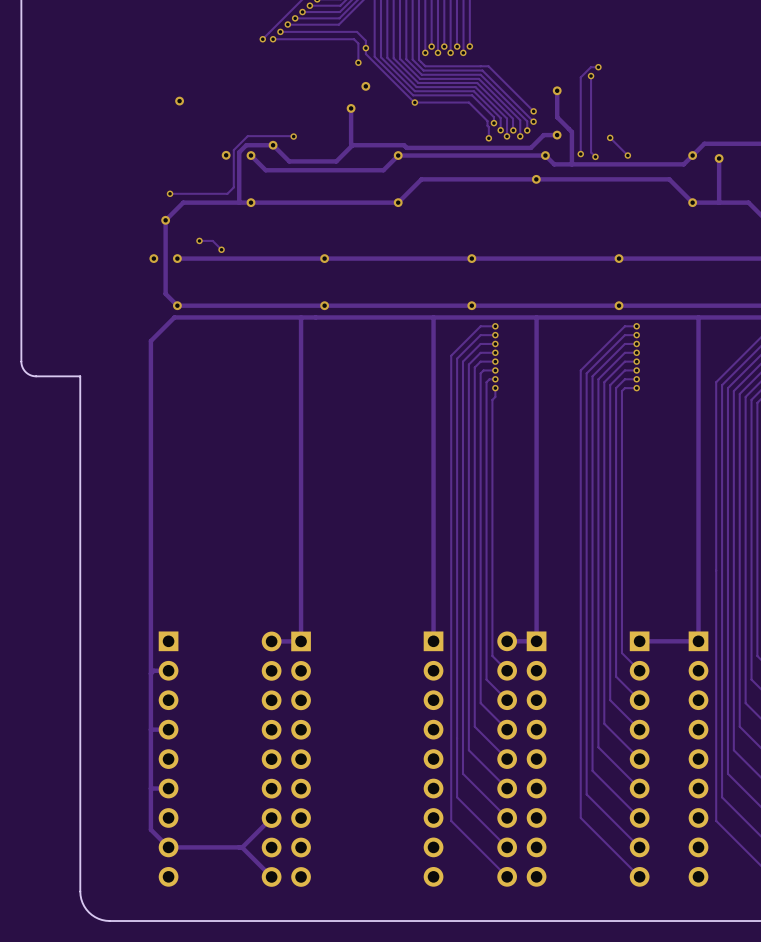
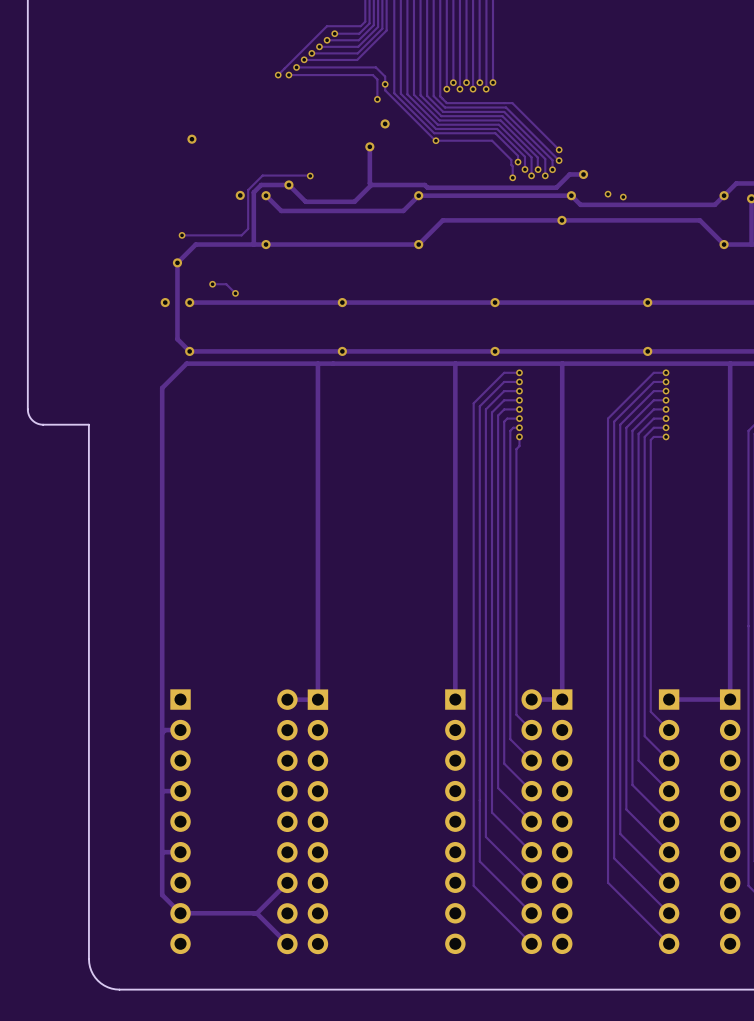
track: (598, 67) (590, 67) (580, 77) (580, 154) -> none
via: (598, 67) -> none
track: (591, 76) (591, 152) (595, 156) -> none
via: (591, 76) -> none
track: (557, 90) (557, 117) (571, 131) (571, 164) -> none
via: (557, 90) -> none
track: (610, 137) (627, 155) -> none
via: (610, 137) -> none
via: (627, 155) -> none

